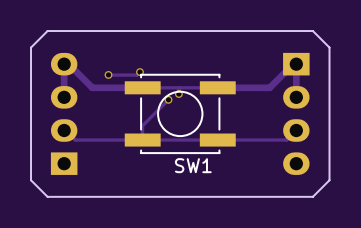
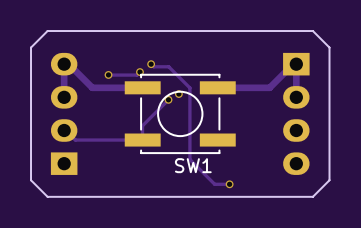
track: none -> (151, 64) (153, 66) (168, 66) (189, 87) (189, 159) (214, 184) (229, 183)
via: none -> (151, 64)
track: (217, 87) (142, 87) -> none
track: (296, 130) (286, 140) (142, 140) -> none
via: none -> (229, 184)

